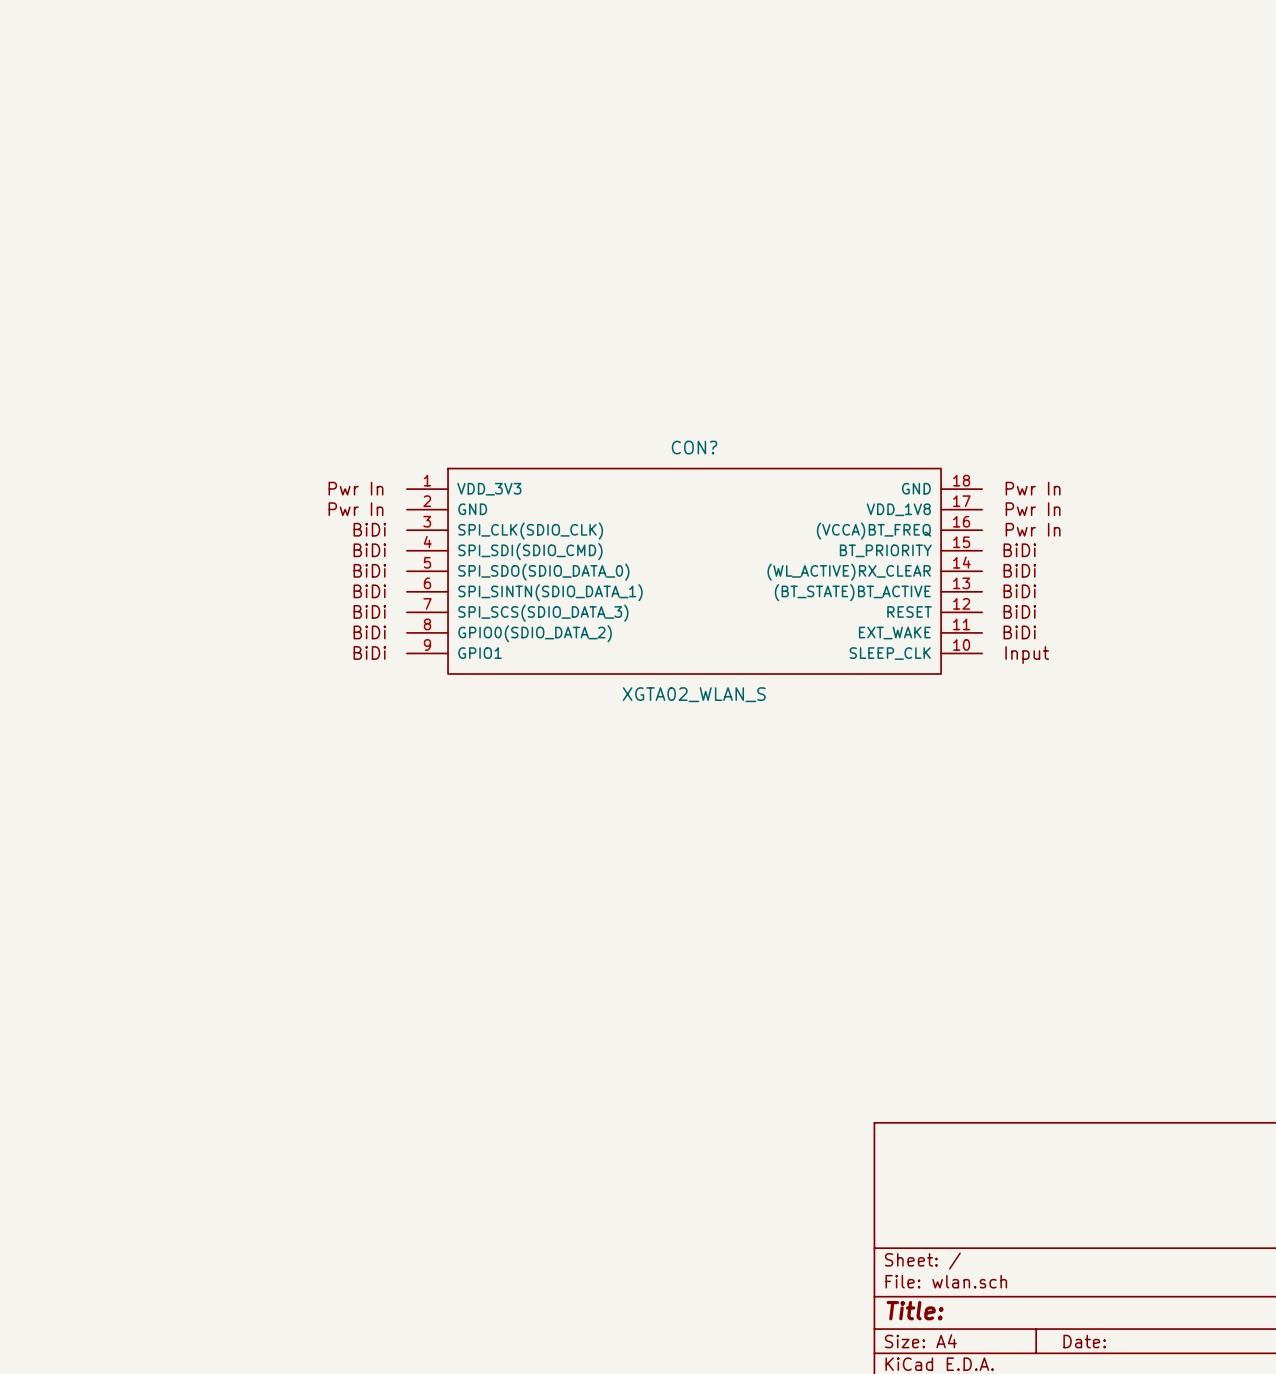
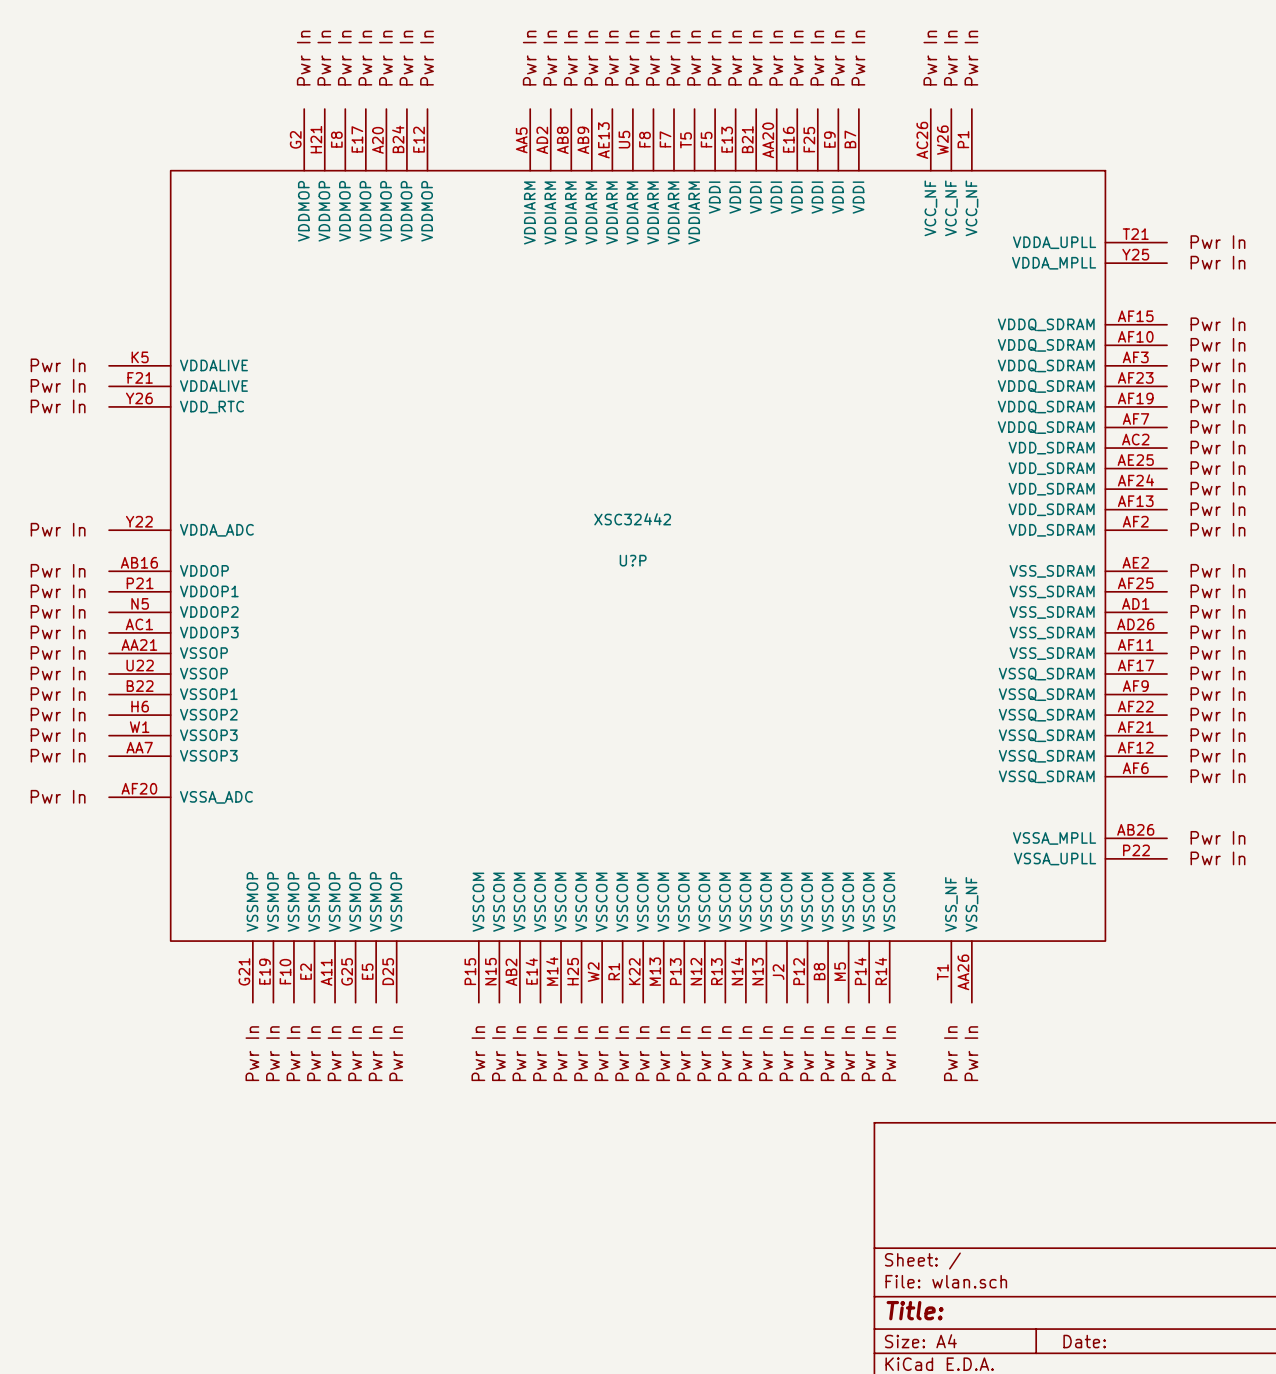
U?P: none -> XSC32442 (638, 555)
CON?: XGTA02_WLAN_S (694, 571) -> none

